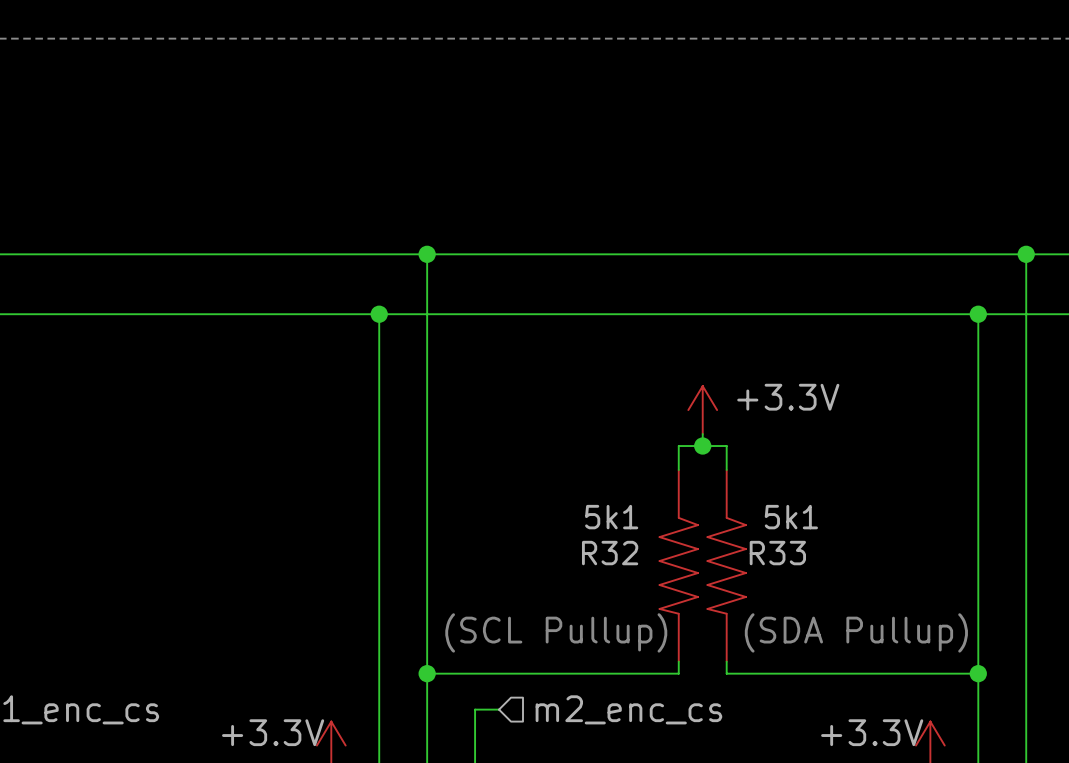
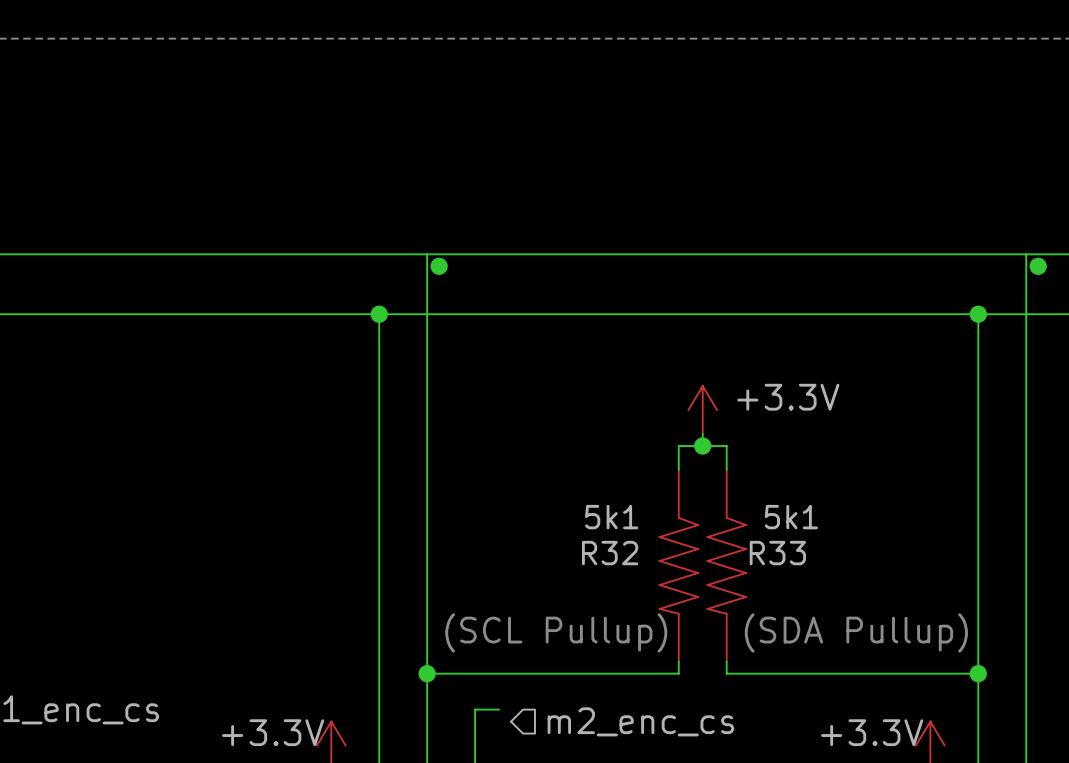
junction position: (427, 254) -> (439, 266)
junction position: (1026, 254) -> (1038, 266)
hierarchical label position: m2_enc_cs (628, 709) -> m2_enc_cs (640, 721)

